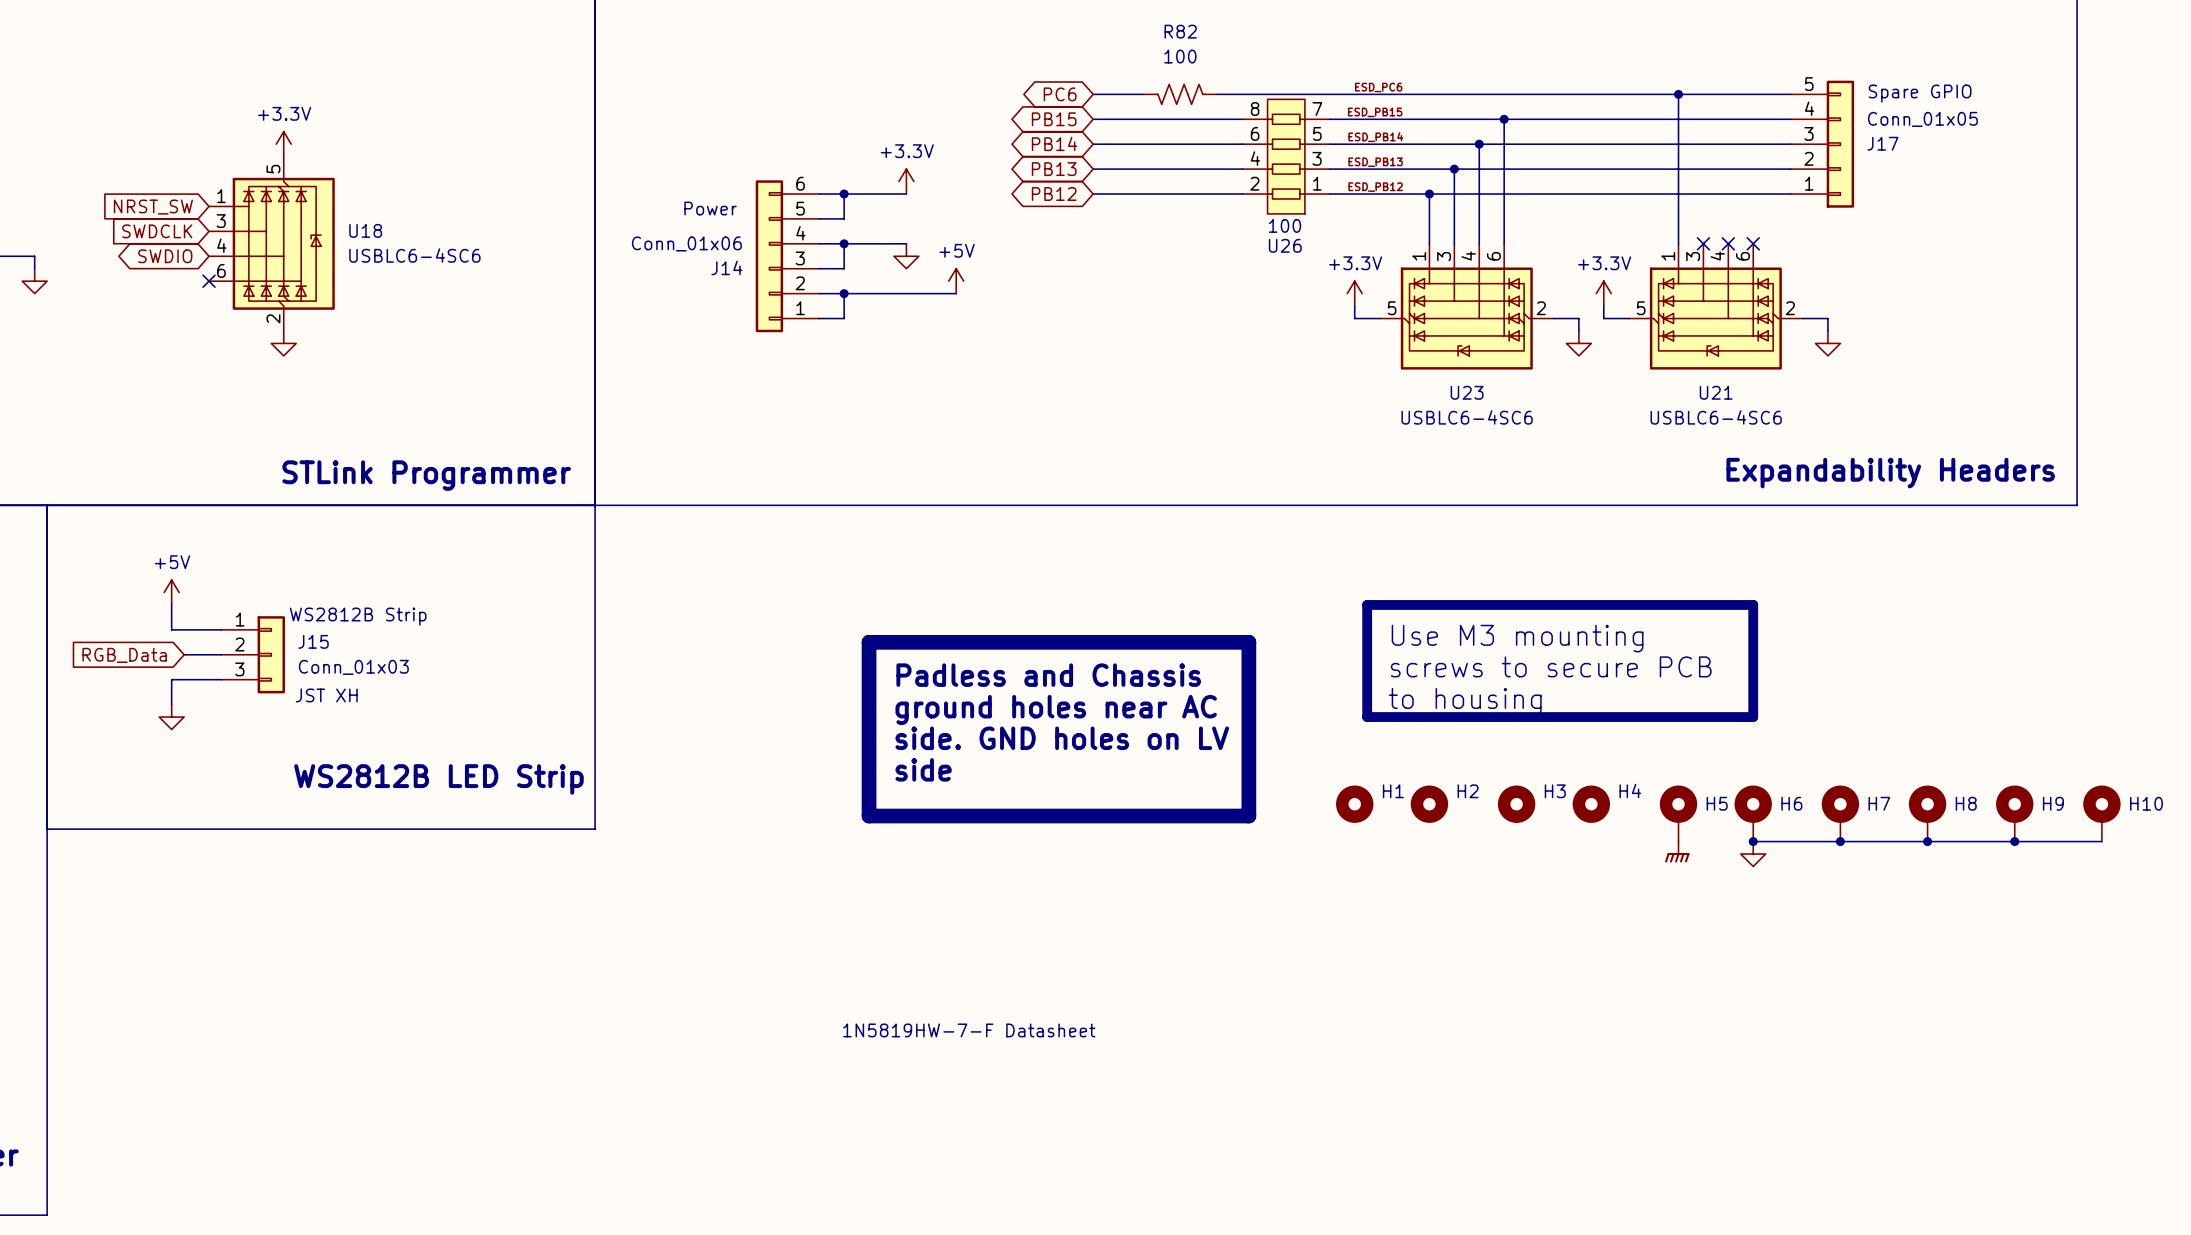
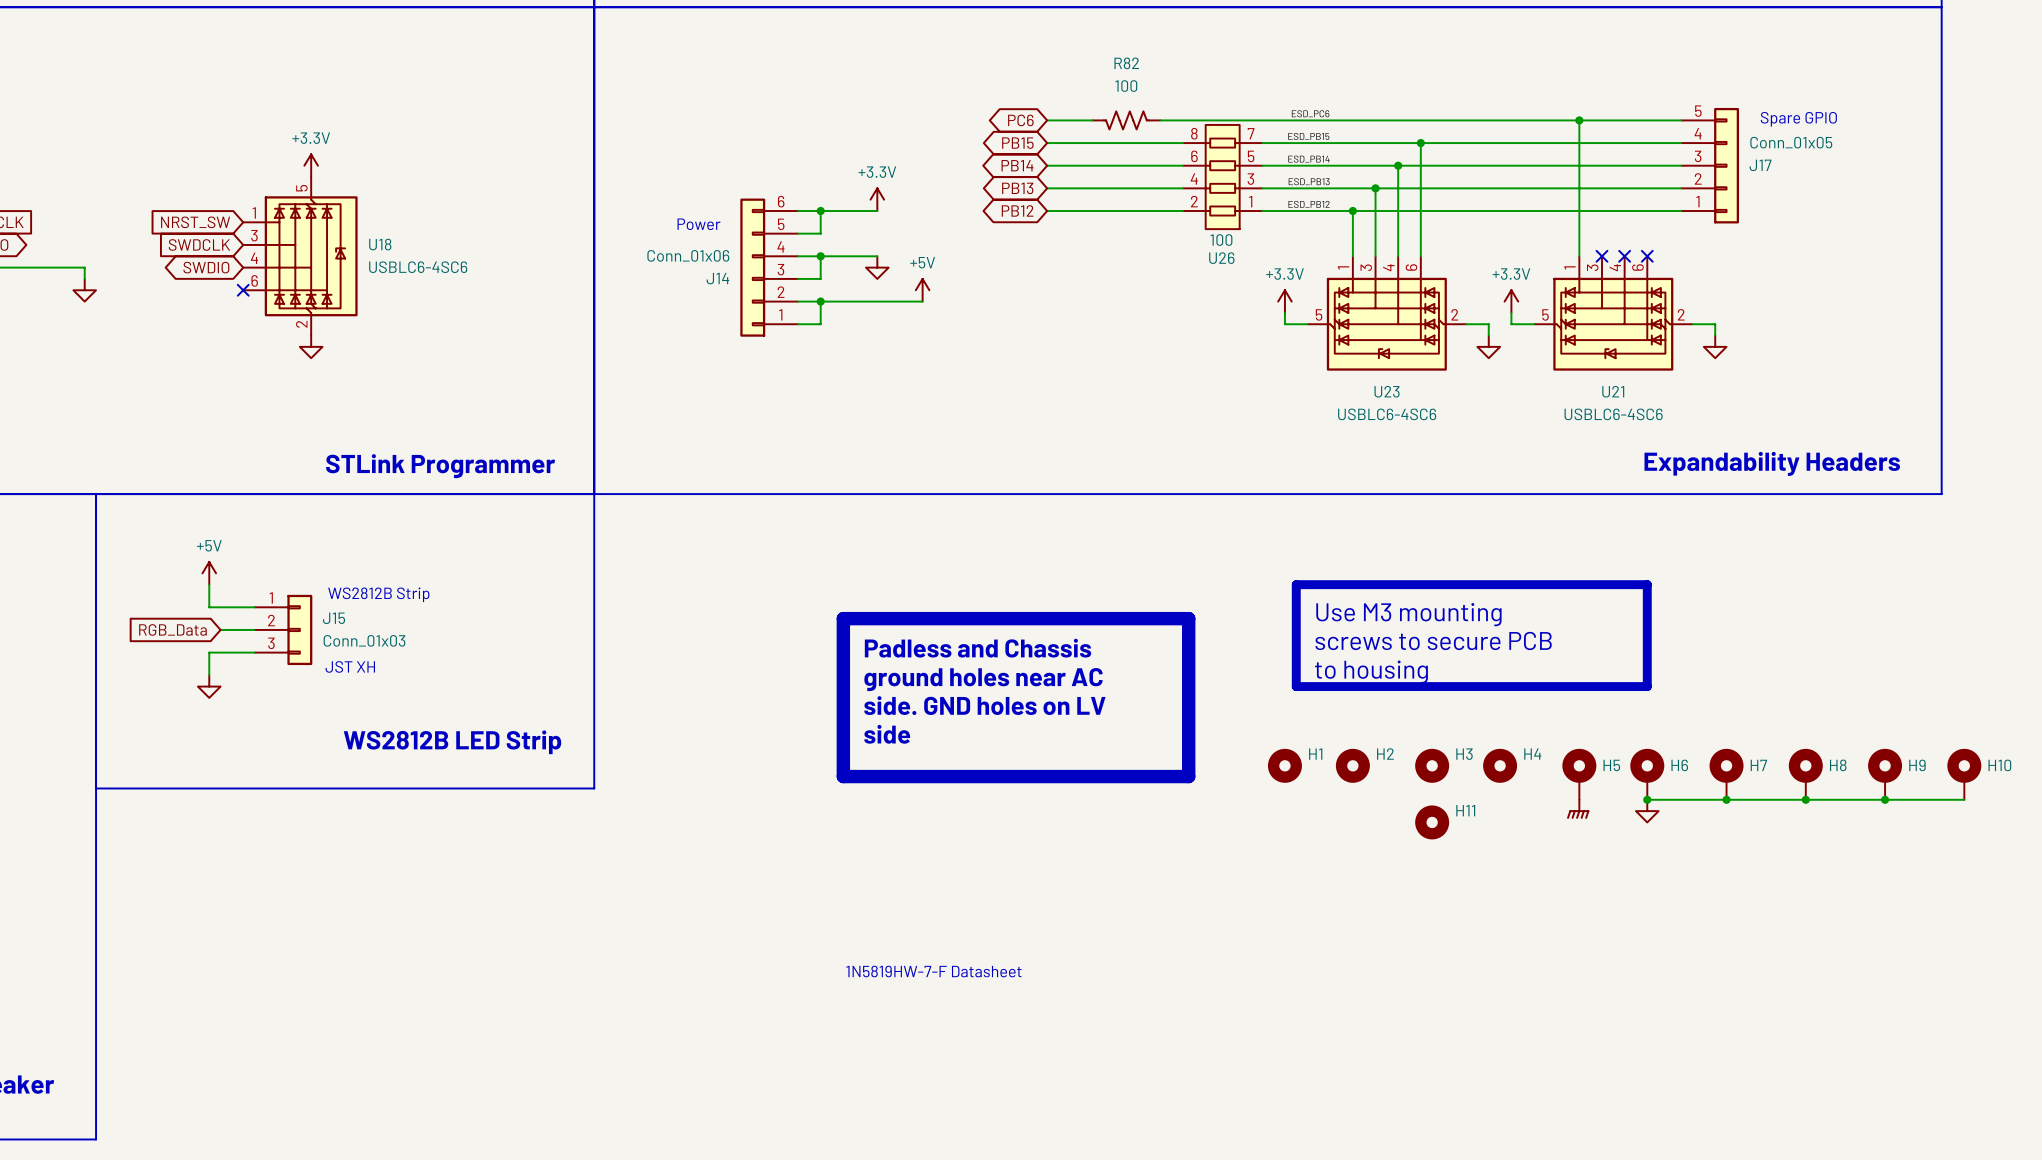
H11: none -> (1432, 822)

